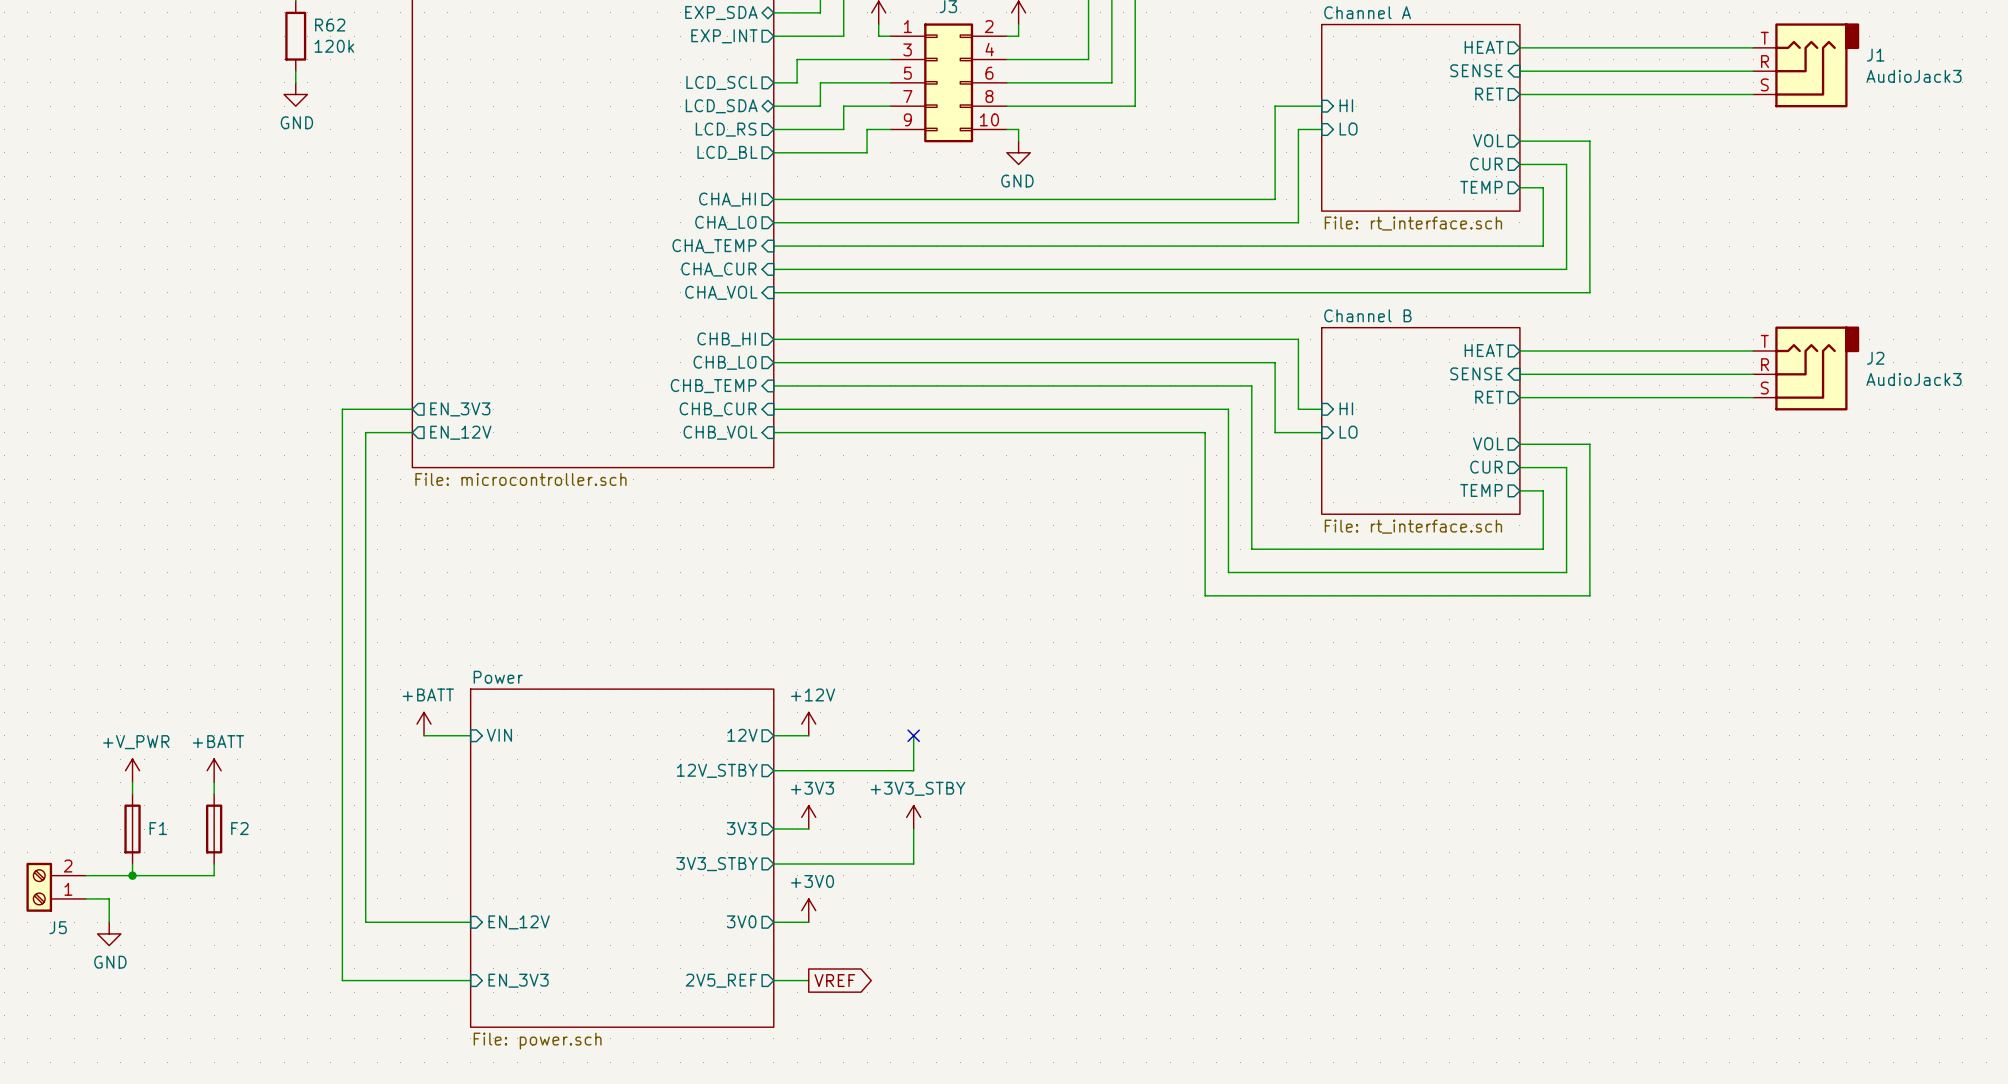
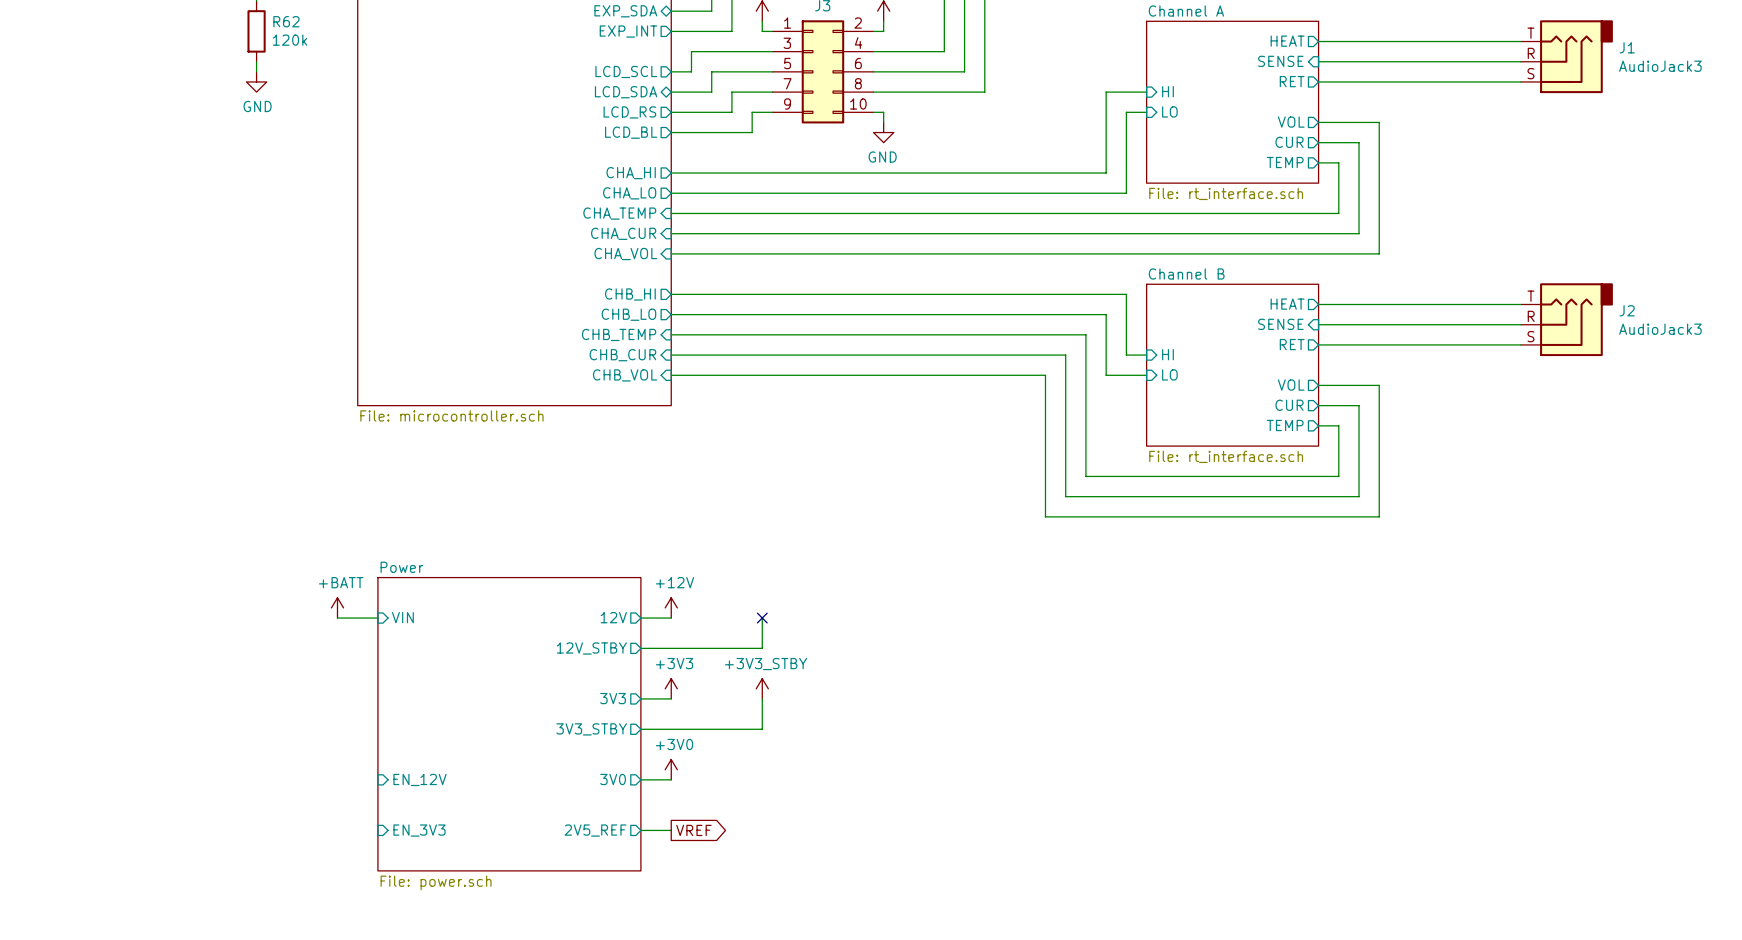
wire: (412, 409) (342, 409) (342, 980) (470, 980) -> none
sheet pin: EN_3V3 (460, 409) -> none
wire: (412, 432) (365, 432) (365, 922) (470, 922) -> none
sheet pin: EN_12V (460, 432) -> none
power symbol position: +BATT (424, 724) -> +BATT (337, 607)
power symbol position: +12V (808, 724) -> +12V (671, 607)
wire: (424, 735) (470, 735) -> (337, 618) (377, 618)
sheet pin position: VIN (499, 735) -> VIN (402, 617)
sheet pin position: 12V (742, 735) -> 12V (613, 617)
wire: (773, 735) (808, 735) -> (640, 618) (671, 618)
wire: (913, 735) (913, 770) (773, 770) -> (762, 618) (762, 648) (640, 648)
no-connect mark position: (913, 735) -> (762, 618)
power symbol: +V_PWR (132, 770) -> none
power symbol: +BATT (214, 770) -> none
sheet pin position: 12V_STBY (717, 770) -> 12V_STBY (591, 648)
wire: (132, 782) (132, 794) -> none
wire: (214, 782) (214, 794) -> none
power symbol position: +3V3 (808, 817) -> +3V3 (671, 688)
power symbol position: +3V3_STBY (913, 817) -> +3V3_STBY (762, 688)
sheet pin position: 3V3 (741, 828) -> 3V3 (613, 698)
F1: (132, 829) -> none
F2: (214, 829) -> none
wire: (773, 829) (808, 829) -> (640, 698) (671, 698)
wire: (913, 829) (913, 863) (773, 863) -> (762, 698) (762, 729) (640, 729)
sheet Power position: (622, 858) -> (509, 724)
wire: (132, 863) (132, 875) -> none
wire: (214, 863) (214, 875) (85, 875) -> none
sheet pin position: 3V3_STBY (716, 864) -> 3V3_STBY (591, 729)
junction: (132, 875) -> none
J5: (56, 887) -> none
wire: (85, 898) (109, 898) (109, 922) -> none
power symbol position: +3V0 (808, 910) -> +3V0 (671, 769)
sheet pin position: 3V0 (741, 921) -> 3V0 (613, 779)
sheet pin position: EN_12V (519, 922) -> EN_12V (420, 779)
wire: (773, 922) (808, 922) -> (640, 779) (671, 779)
power symbol: GND (109, 933) -> none
sheet pin position: EN_3V3 (518, 980) -> EN_3V3 (419, 830)
sheet pin position: 2V5_REF (721, 980) -> 2V5_REF (595, 830)
wire: (773, 980) (808, 980) -> (640, 830) (671, 830)
global label position: VREF (834, 980) -> VREF (693, 830)

